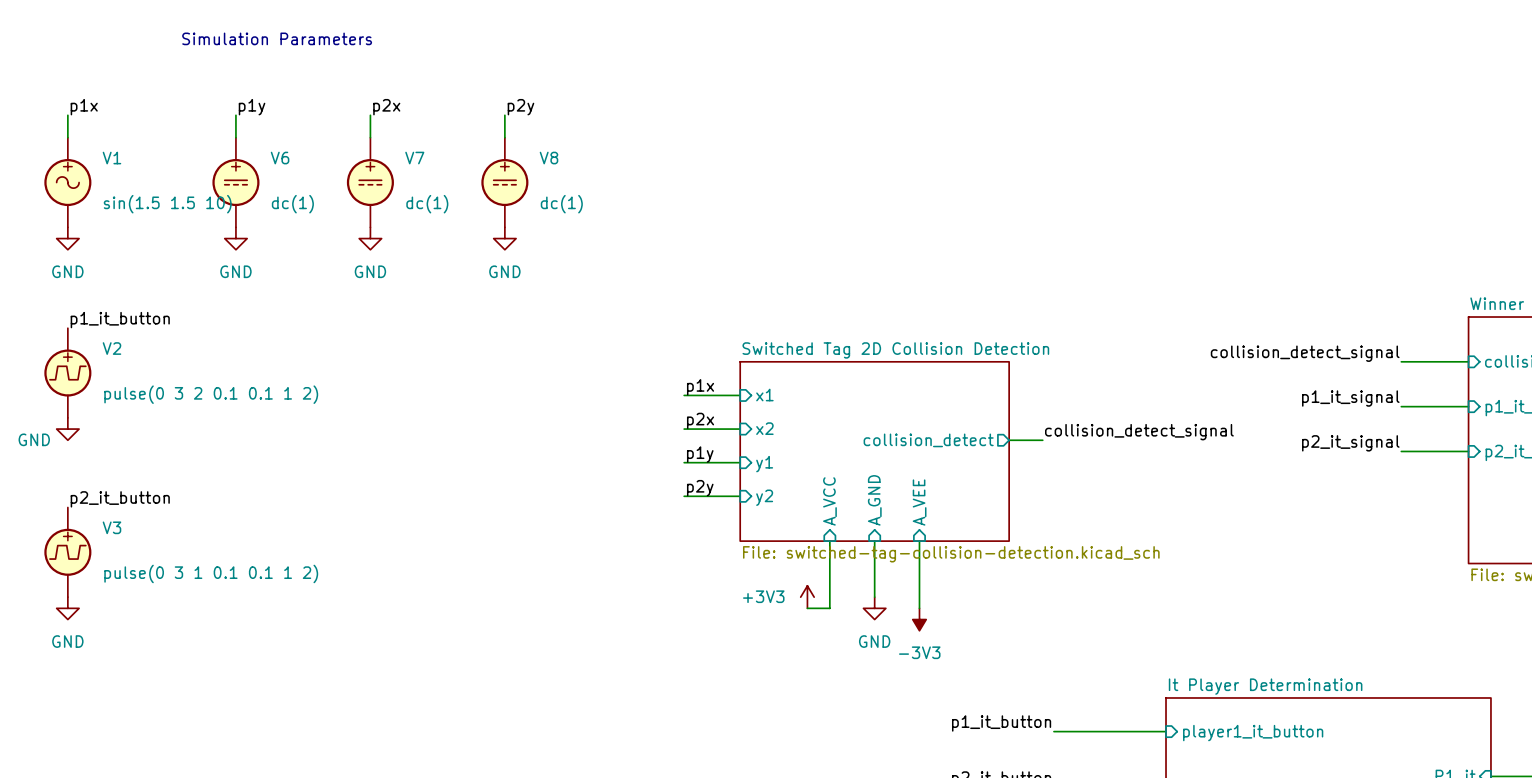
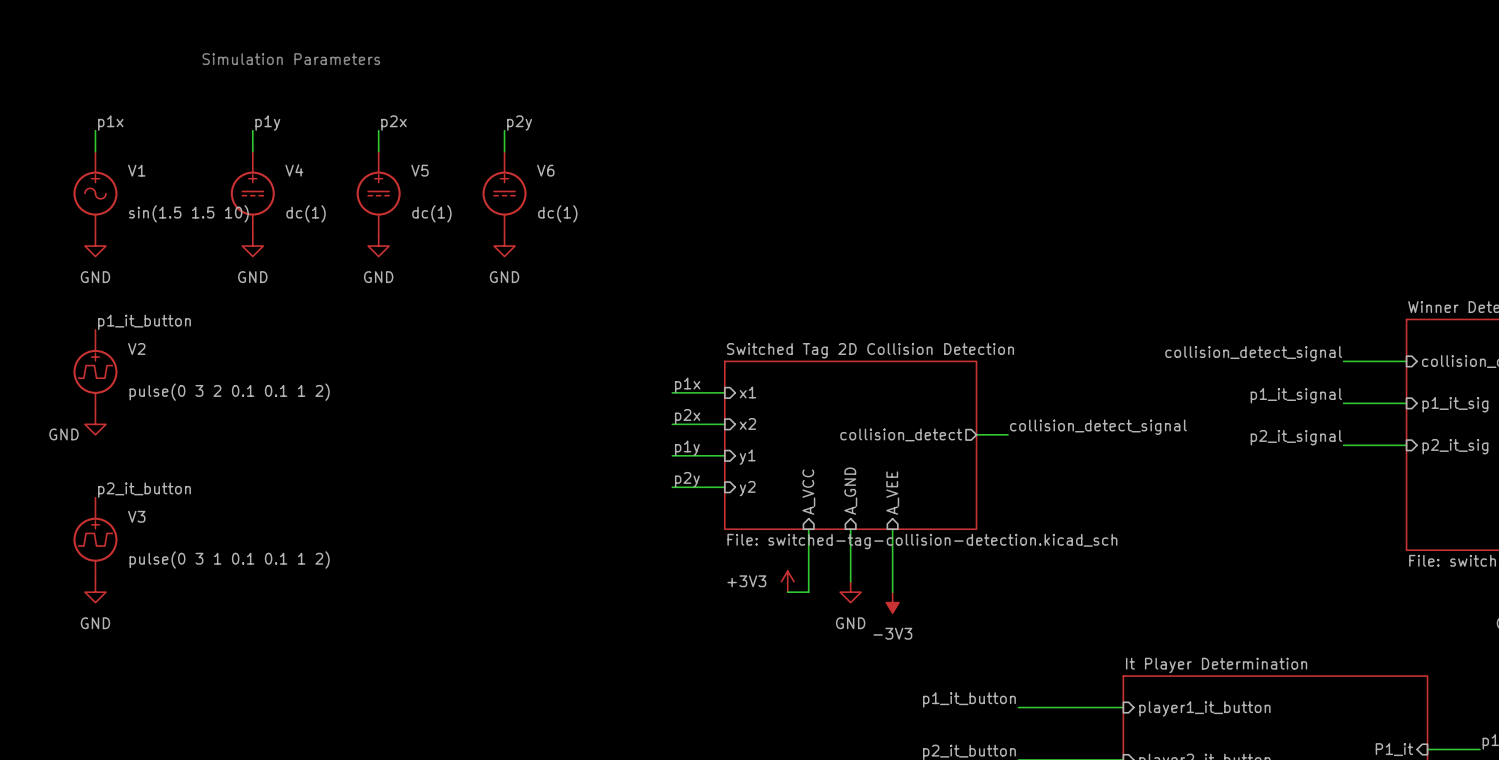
V6 name: V6 (280, 158) -> V4 (294, 170)
V7 name: V7 (414, 158) -> V5 (419, 170)
V8 name: V8 (548, 158) -> V6 (545, 170)

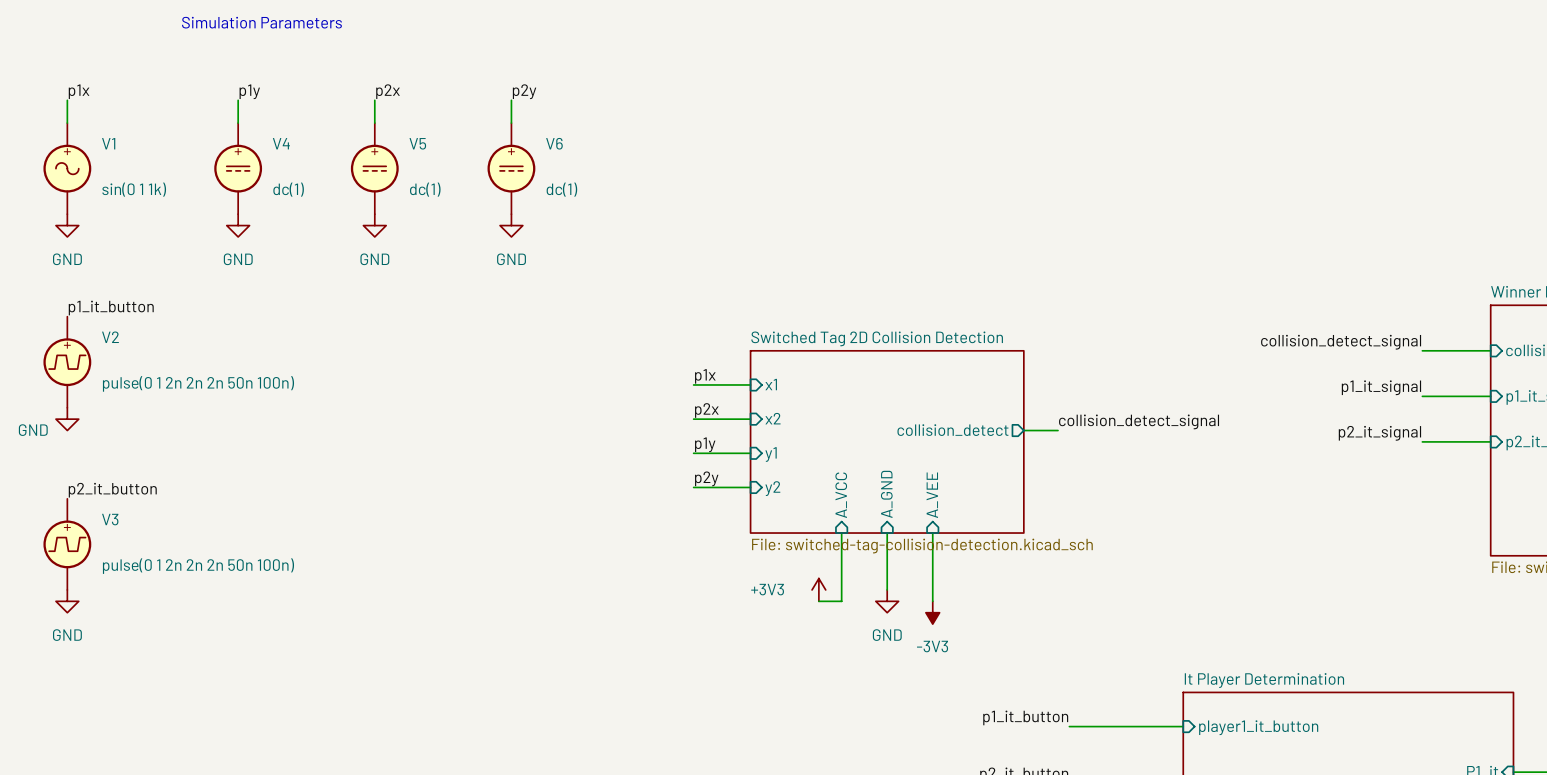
V1 text: sin(1.5 1.5 10) (188, 213) -> sin(0 1 1k) (134, 189)
V2 text: pulse(0 3 2 0.1 0.1 1 2) (229, 392) -> pulse(0 1 2n 2n 2n 50n 100n) (198, 383)
V3 text: pulse(0 3 1 0.1 0.1 1 2) (229, 559) -> pulse(0 1 2n 2n 2n 50n 100n) (198, 566)

